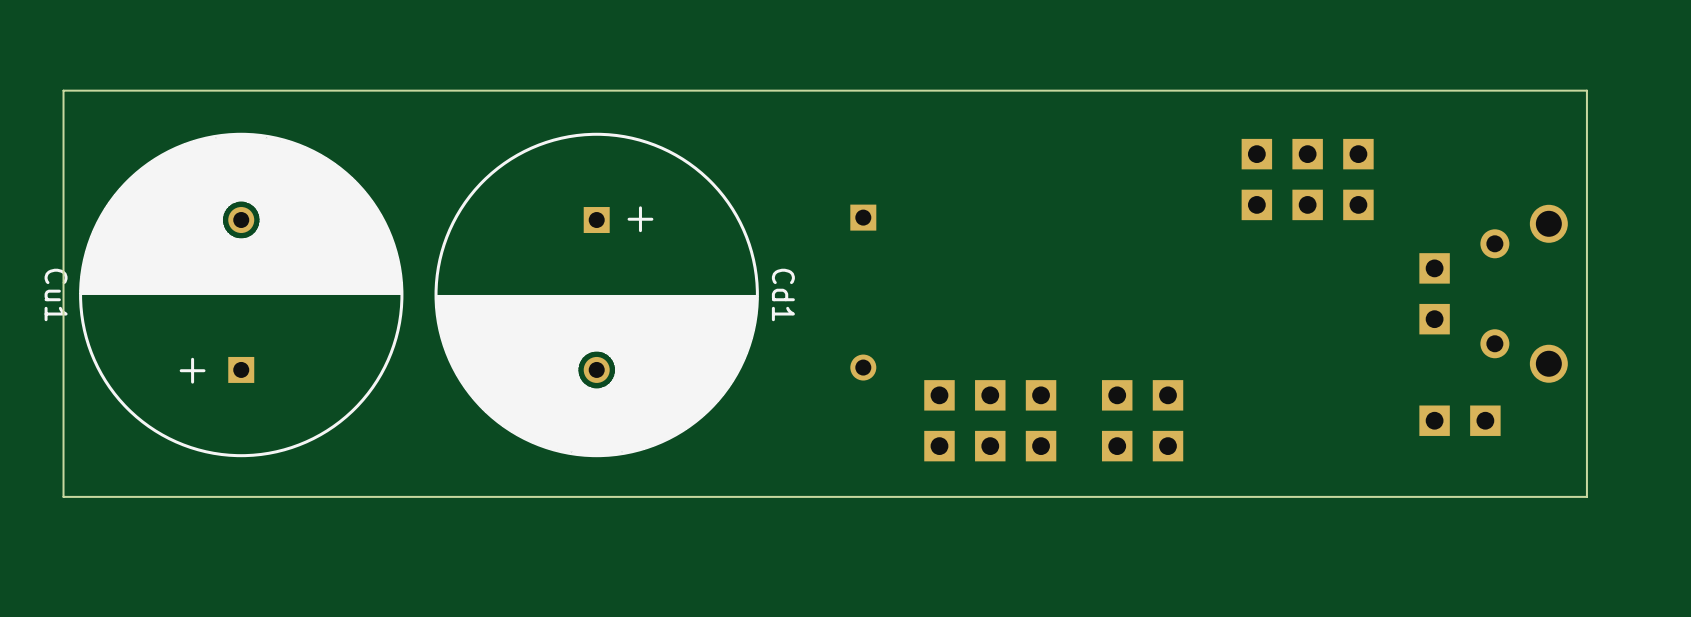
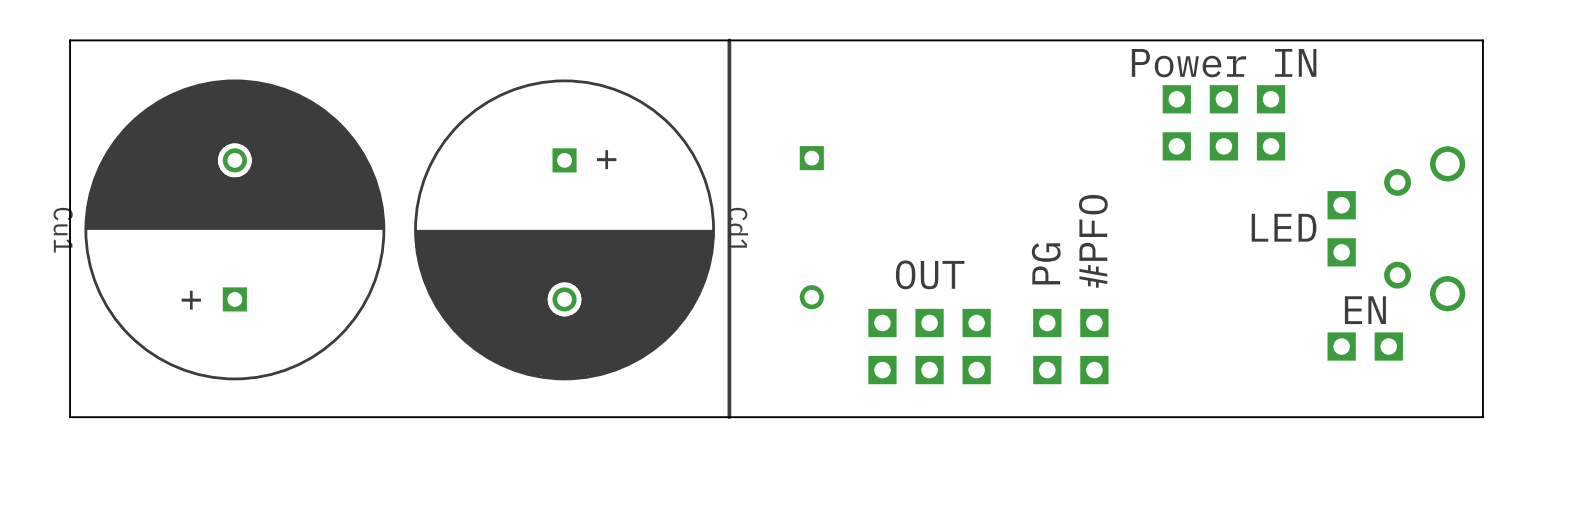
line: none -> (729, 40) (729, 417)
text: none -> Power IN (1224, 63)
text: none -> LED (1284, 227)
text: none -> #PFO (1093, 241)
text: none -> PG (1046, 263)
text: none -> OUT (930, 274)
text: none -> EN (1365, 310)

